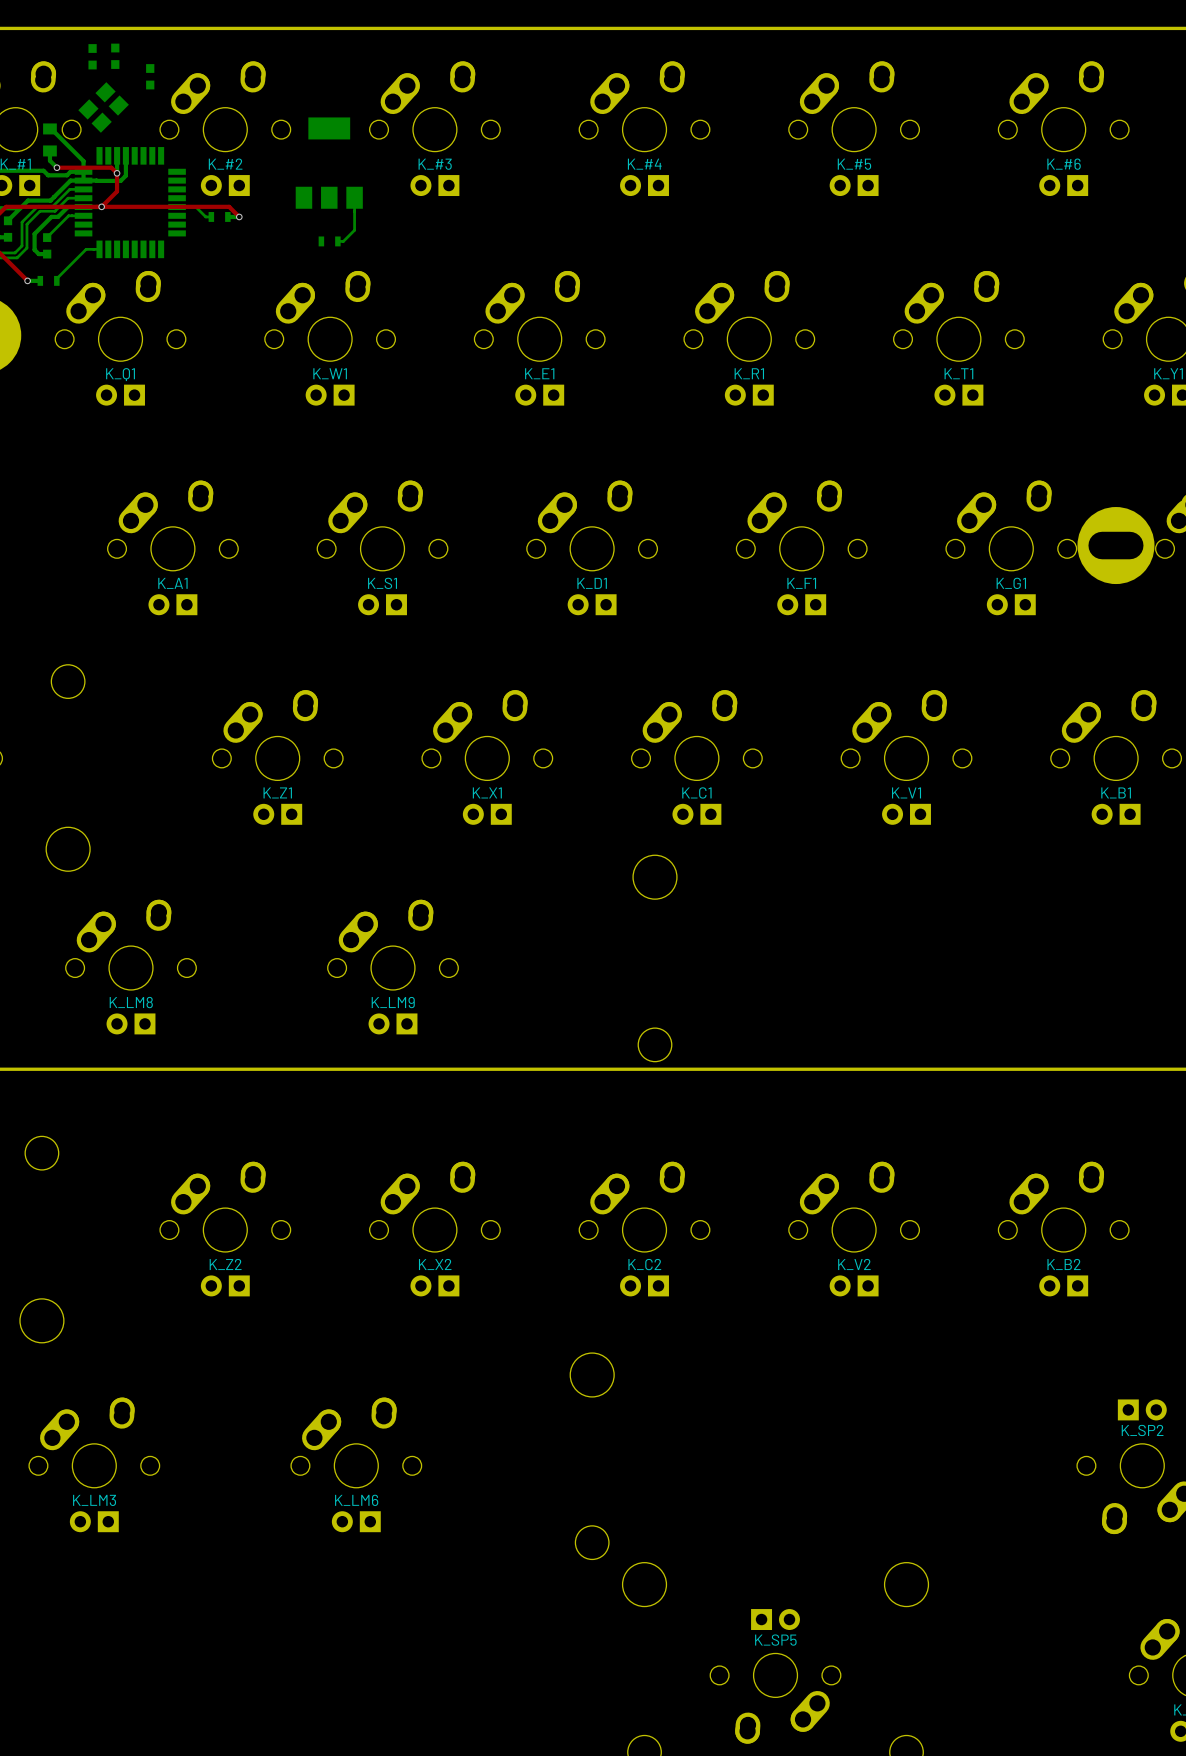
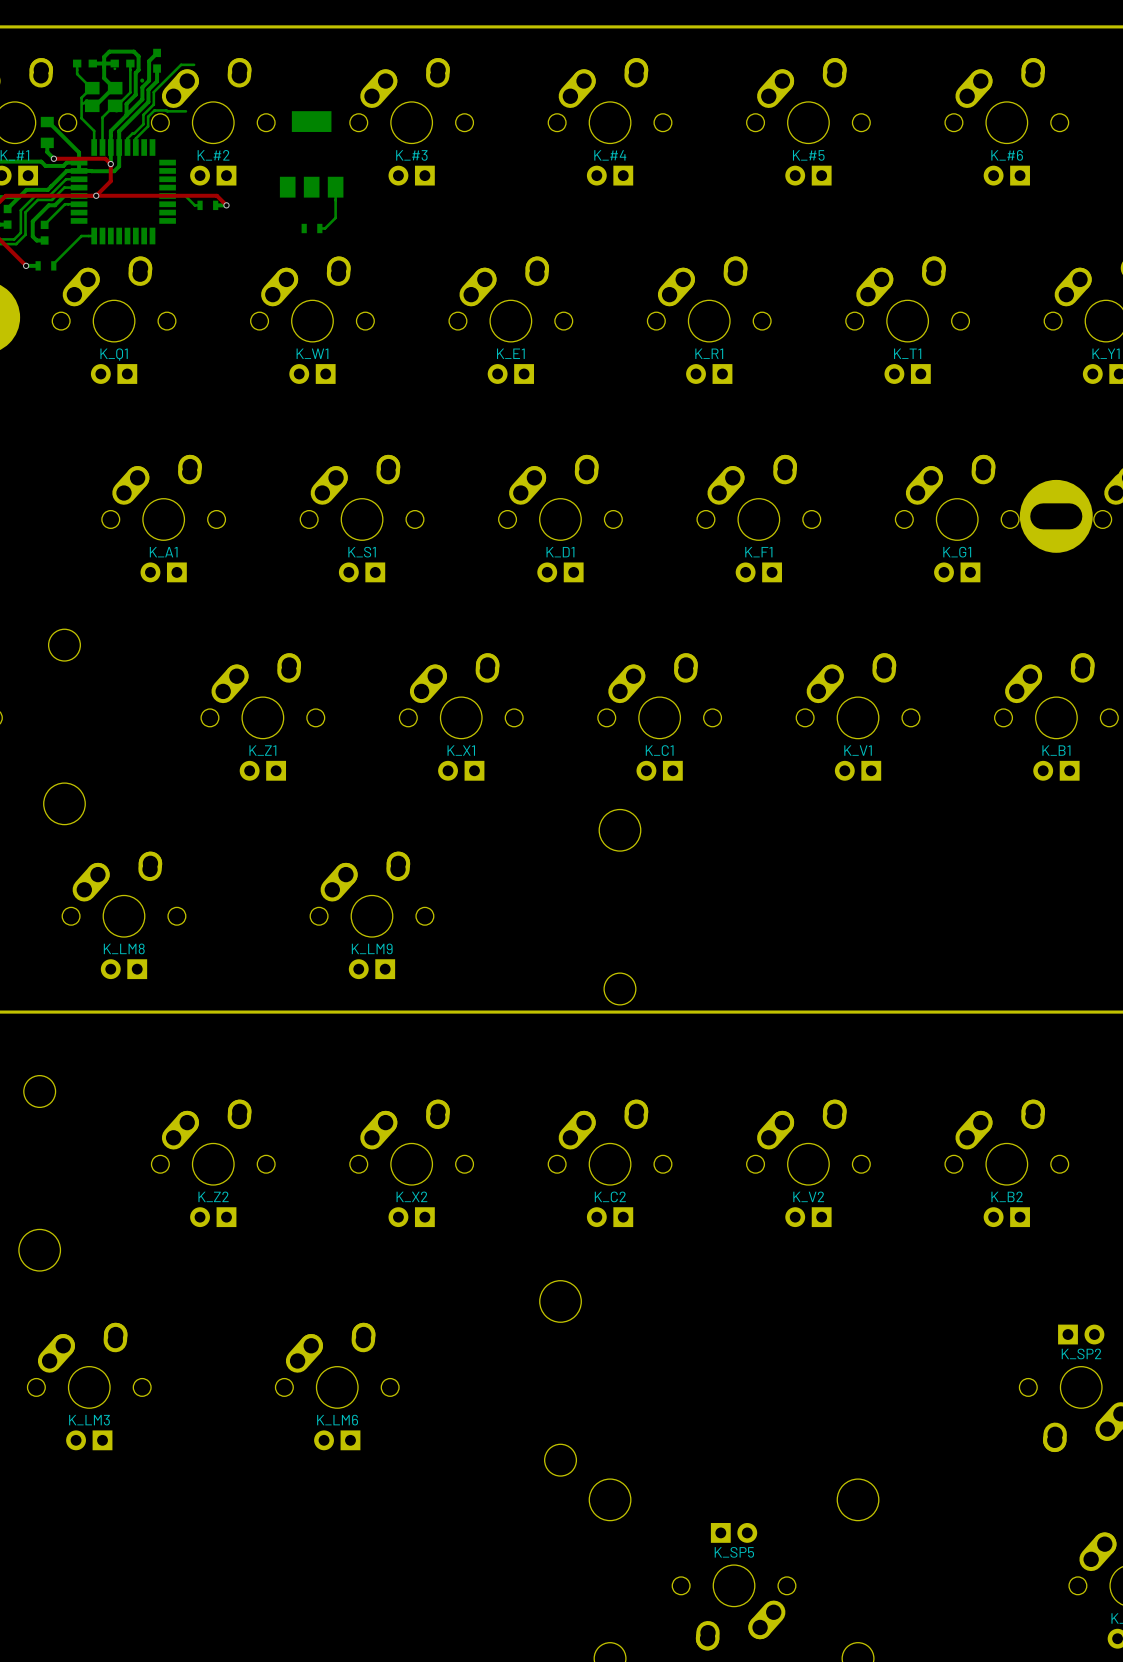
bottom track: none -> (157, 52) (149, 61) (149, 80) (142, 87) (142, 99) (110, 131) (110, 147)
part rotation: 0° (92, 56) -> 90° clockwise (84, 63)
part: (115, 56) -> none
part: none -> (157, 60)
bottom track: none -> (77, 63) (77, 74) (91, 88)
part: none -> (122, 63)
bottom track: none -> (130, 63) (130, 92) (102, 117) (102, 147)
bottom track: none -> (194, 64) (181, 64) (153, 92) (153, 104) (143, 114) (143, 124) (127, 138) (127, 147)
bottom track: none -> (114, 68) (115, 68)
bottom track: none -> (157, 68) (157, 81) (148, 89) (148, 101) (119, 131) (119, 147)
part: (150, 76) -> none
bottom track: none -> (91, 88) (81, 97) (81, 118) (94, 130) (94, 147)
bottom track: none -> (114, 88) (104, 78) (104, 56) (109, 51) (133, 51) (138, 56) (138, 70) (135, 72) (135, 94) (126, 104) (126, 115)
bottom track: none -> (115, 88) (95, 105) (92, 105)
part rotation: 0° (103, 107) -> 45° clockwise (103, 96)
bottom track: none -> (185, 111) (154, 110) (148, 116) (148, 126) (135, 138) (135, 147)

